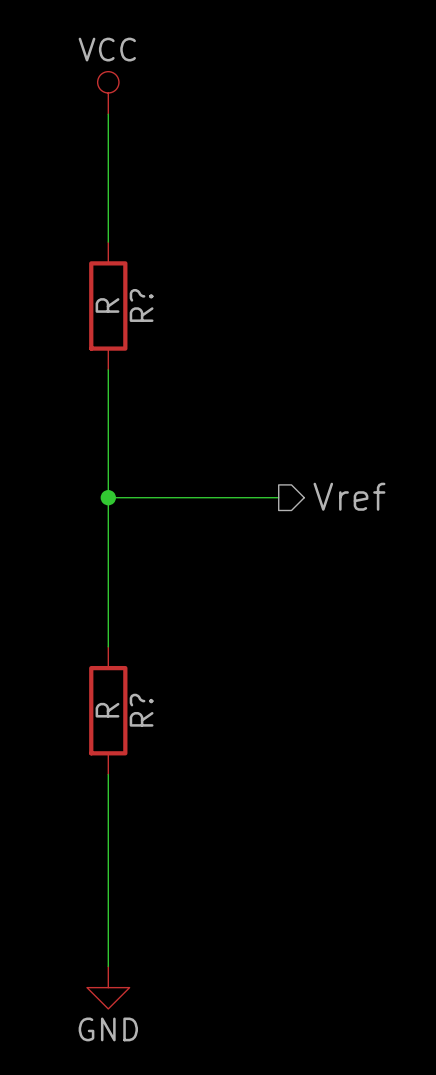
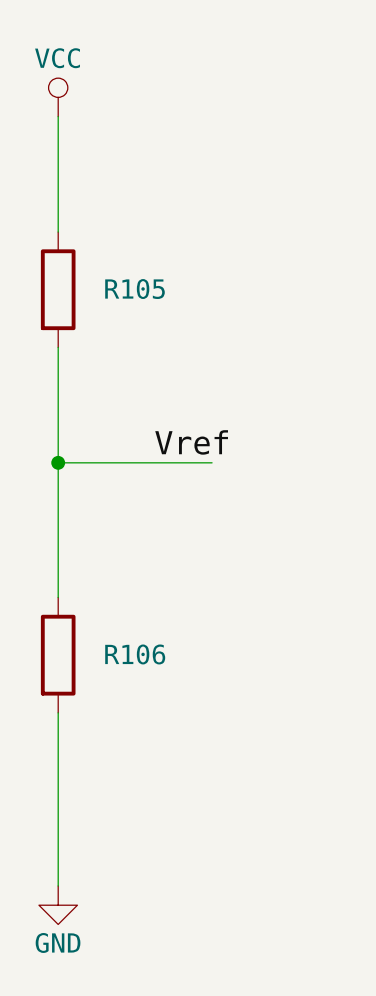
R? value: R (107, 305) -> none
R? name: R? (141, 305) -> R105 (135, 289)
label: none -> Vref (191, 442)
hierarchical label: Vref (349, 496) -> none
R? value: R (107, 710) -> none
R? name: R? (141, 710) -> R106 (135, 654)

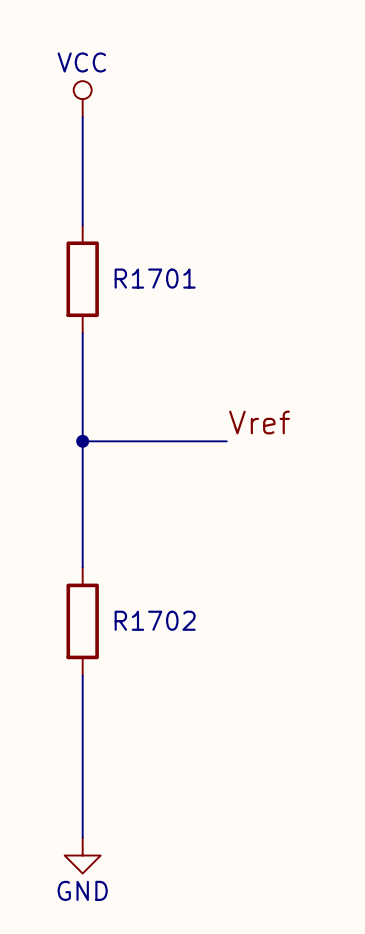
R105 name: R105 (135, 289) -> R1701 (155, 278)
label position: Vref (191, 442) -> Vref (259, 422)
R106 name: R106 (135, 654) -> R1702 (155, 620)

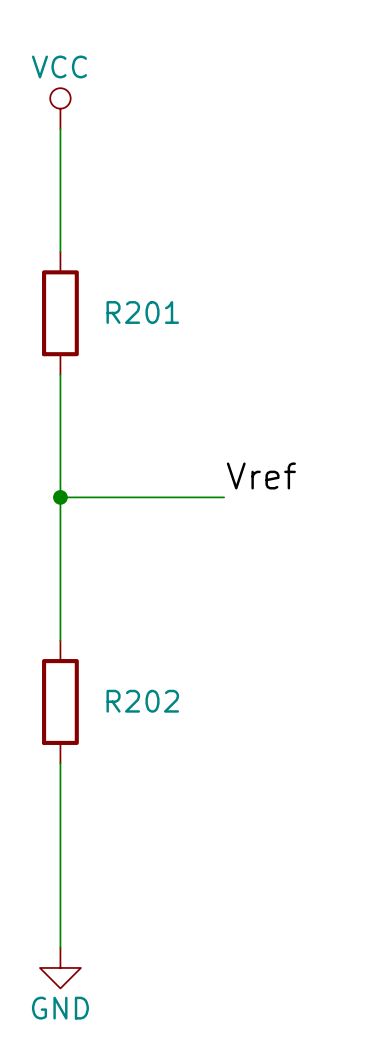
R1701 name: R1701 (155, 278) -> R201 (142, 312)
R1702 name: R1702 (155, 620) -> R202 (142, 701)

